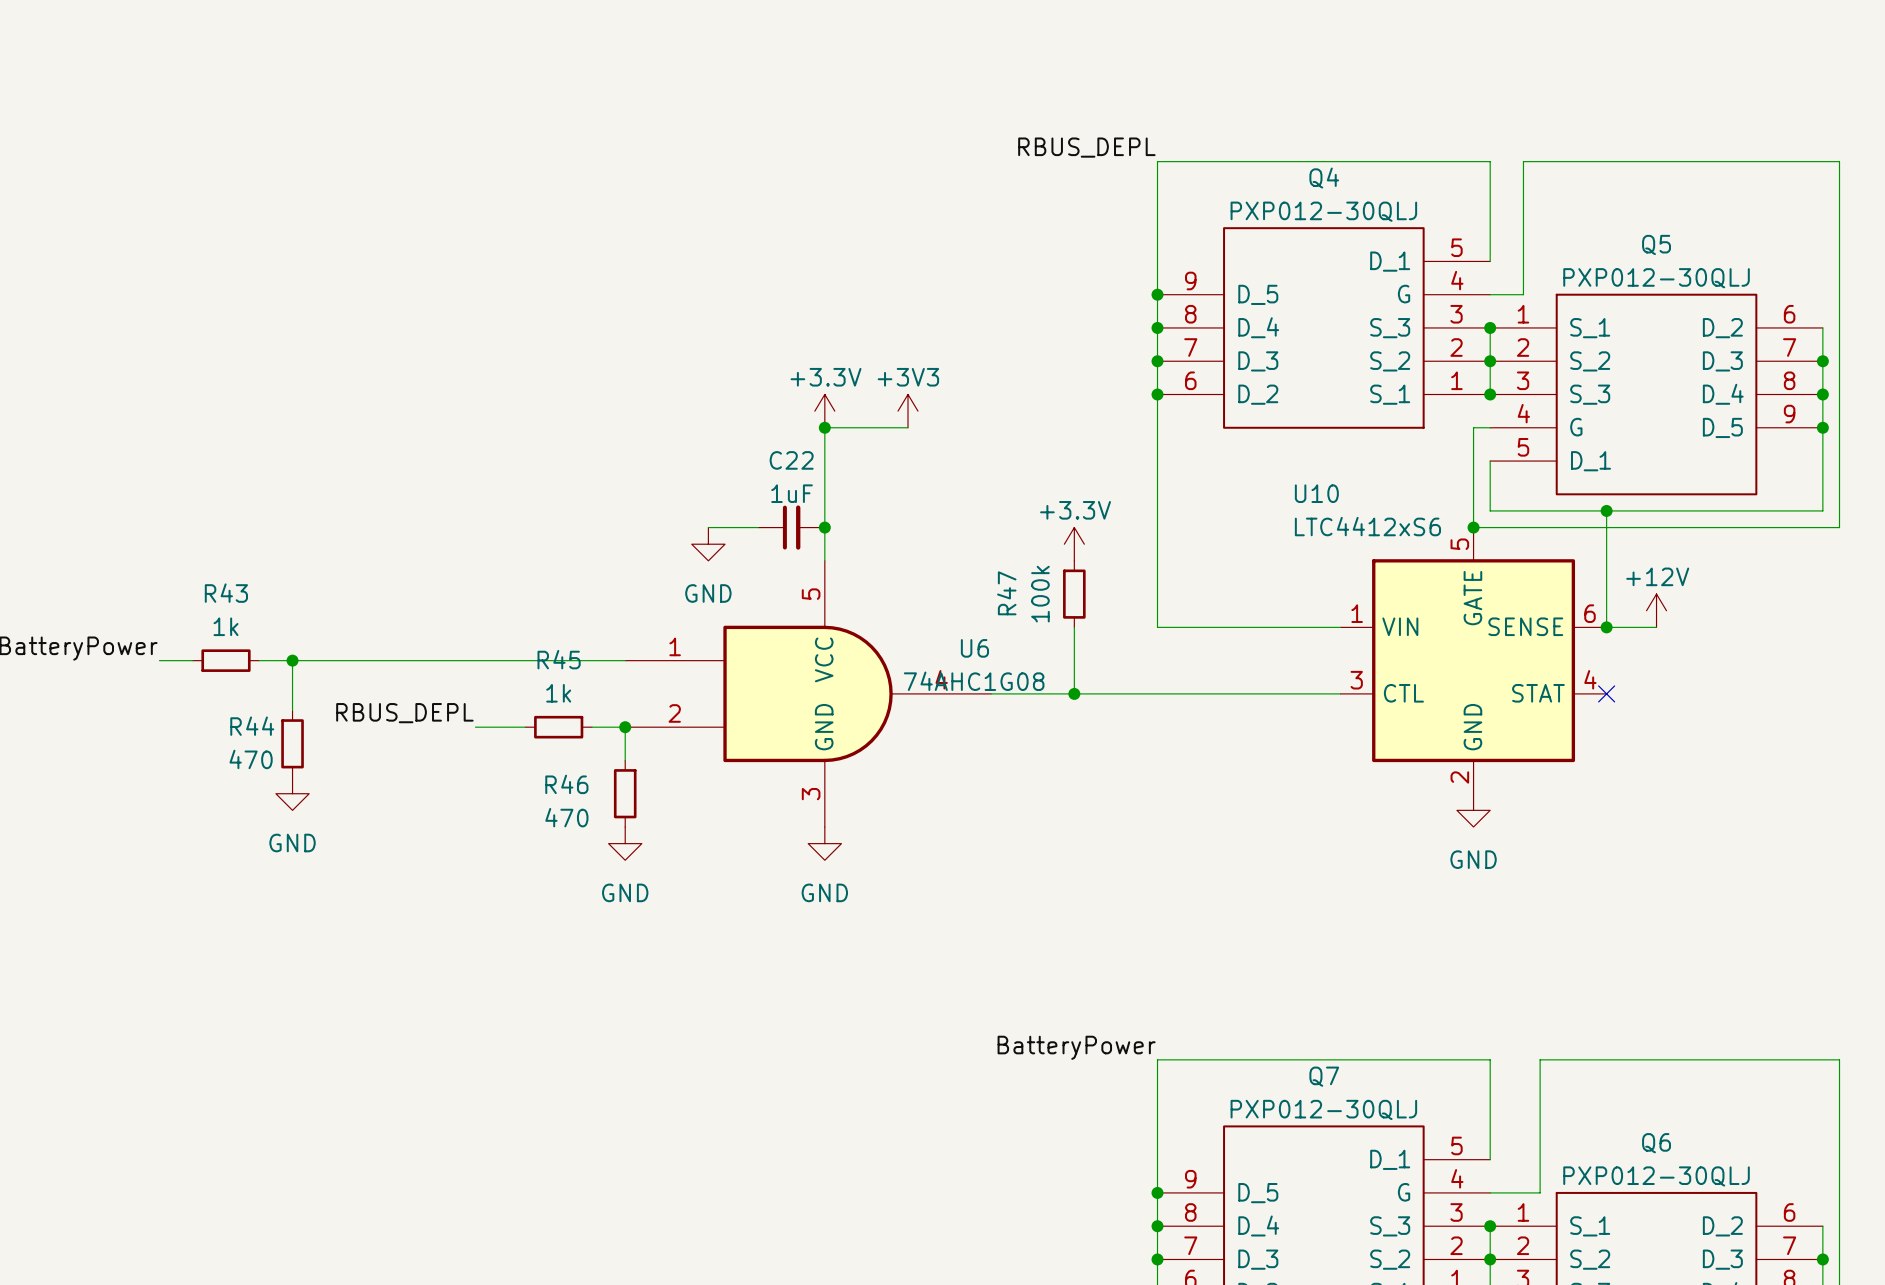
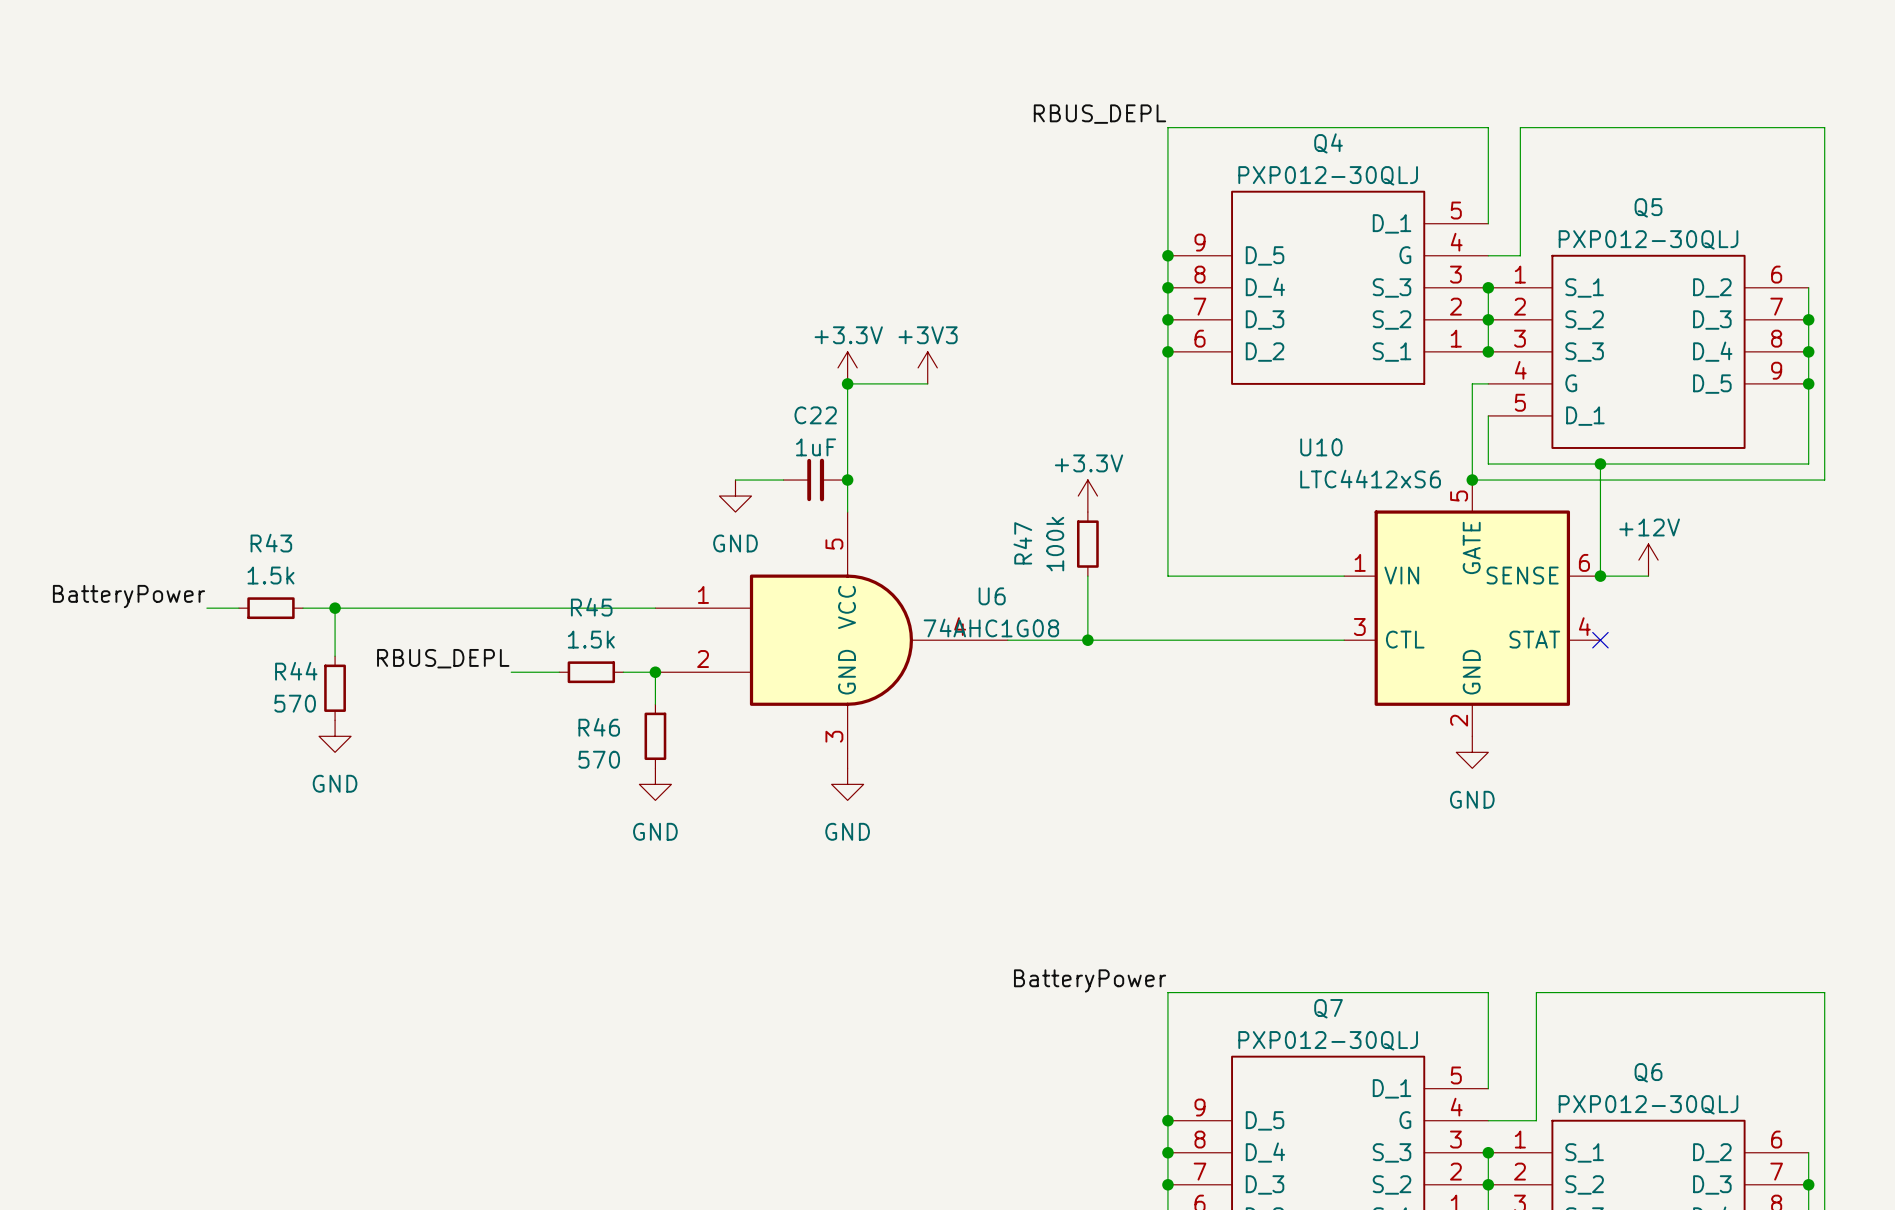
R43 value: 1k (226, 626) -> 1.5k (270, 575)
R45 value: 1k (558, 693) -> 1.5k (591, 639)
R44 value: 470 (251, 759) -> 570 (295, 703)
R46 value: 470 (566, 817) -> 570 (599, 759)

